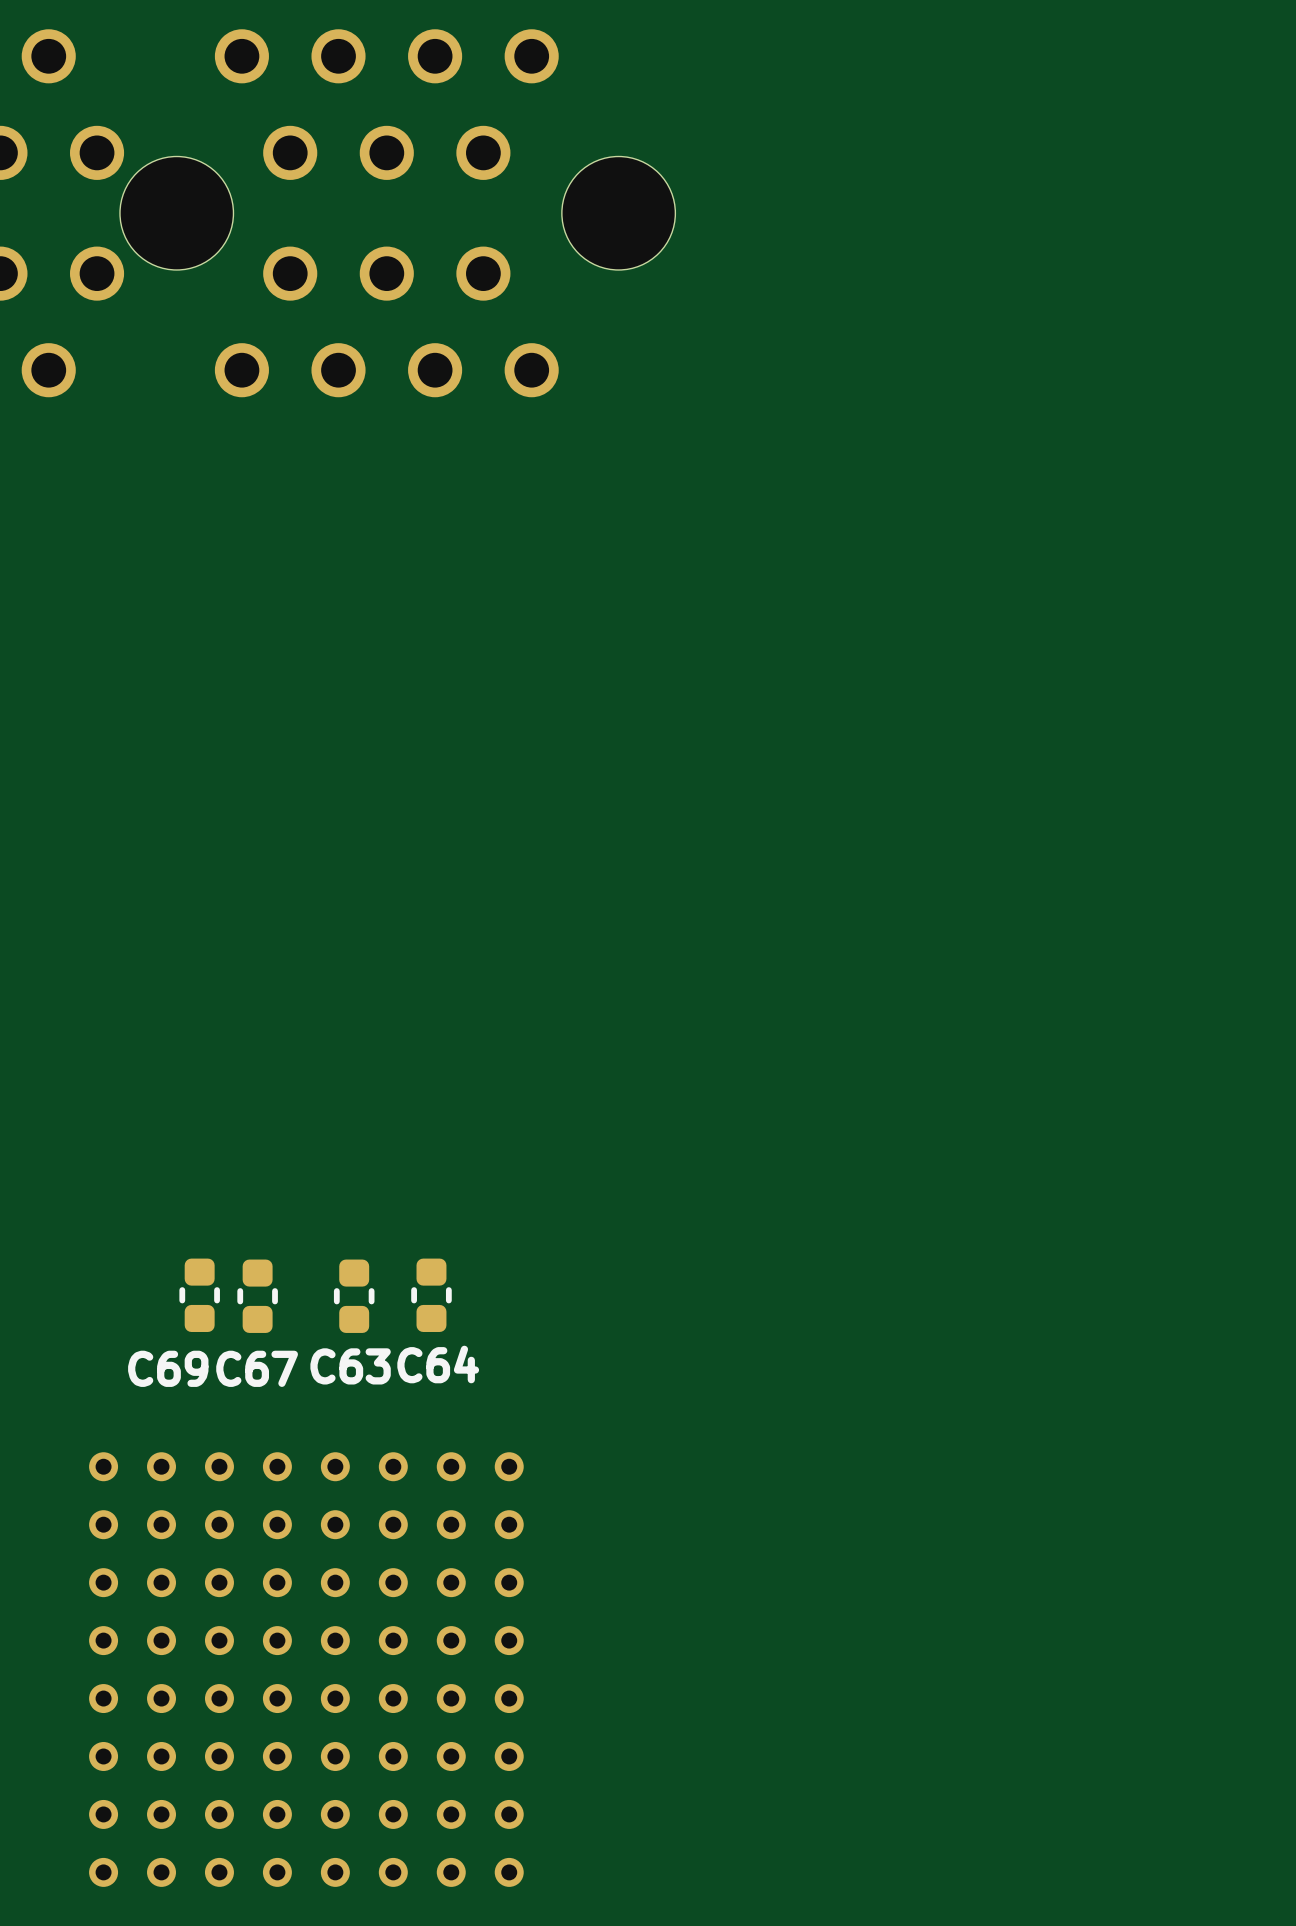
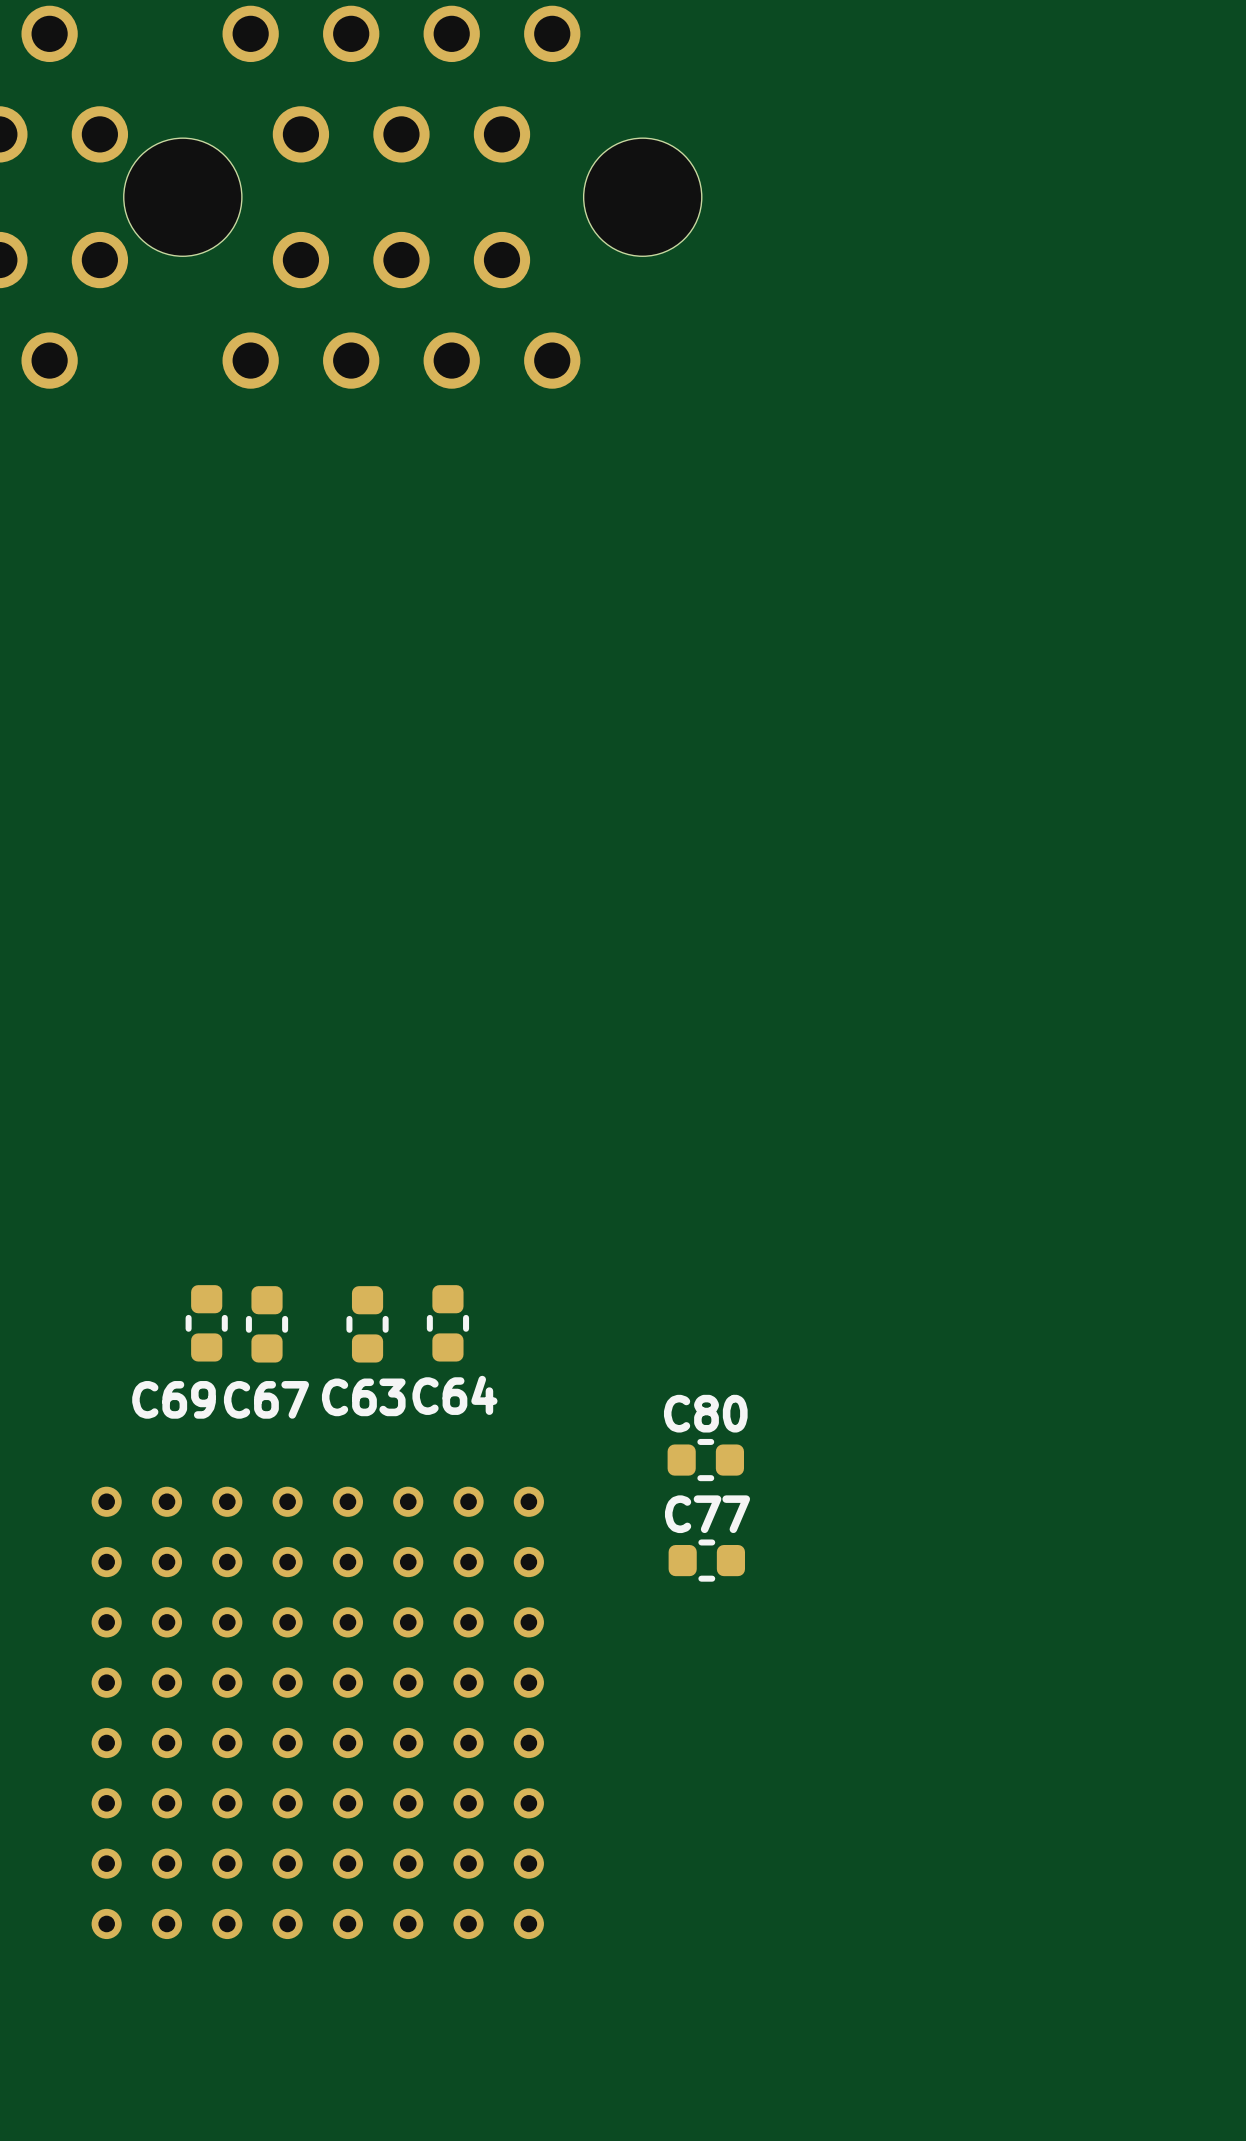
C80: none -> (705, 1460)
C77: none -> (706, 1560)

